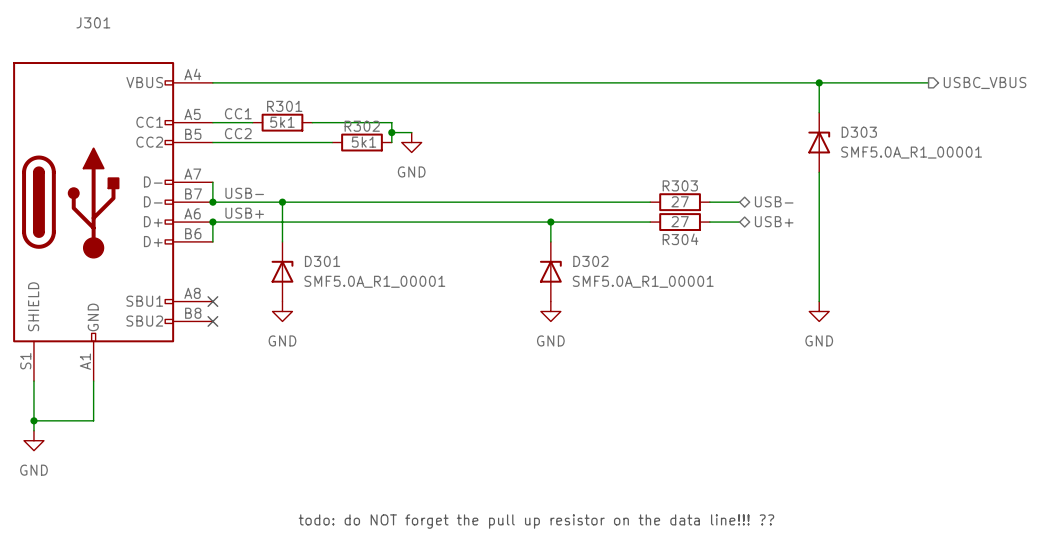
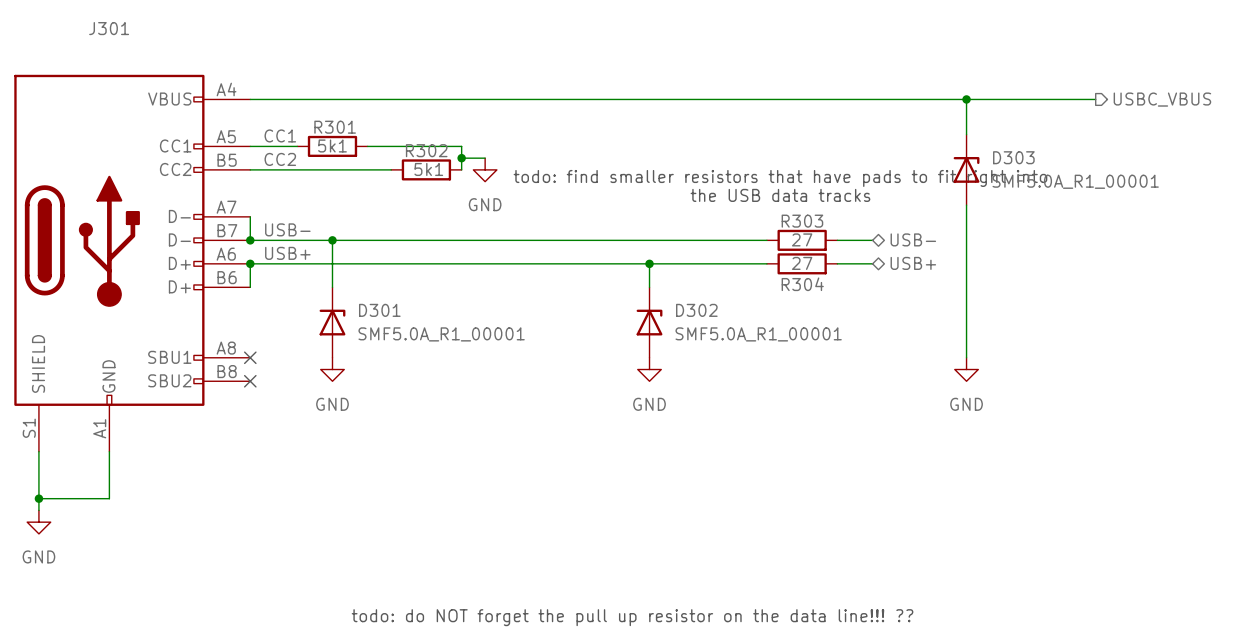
text: none -> todo: find smaller resistors that have pads to fit right into (780, 178)
text: none -> the USB data tracks (780, 195)

